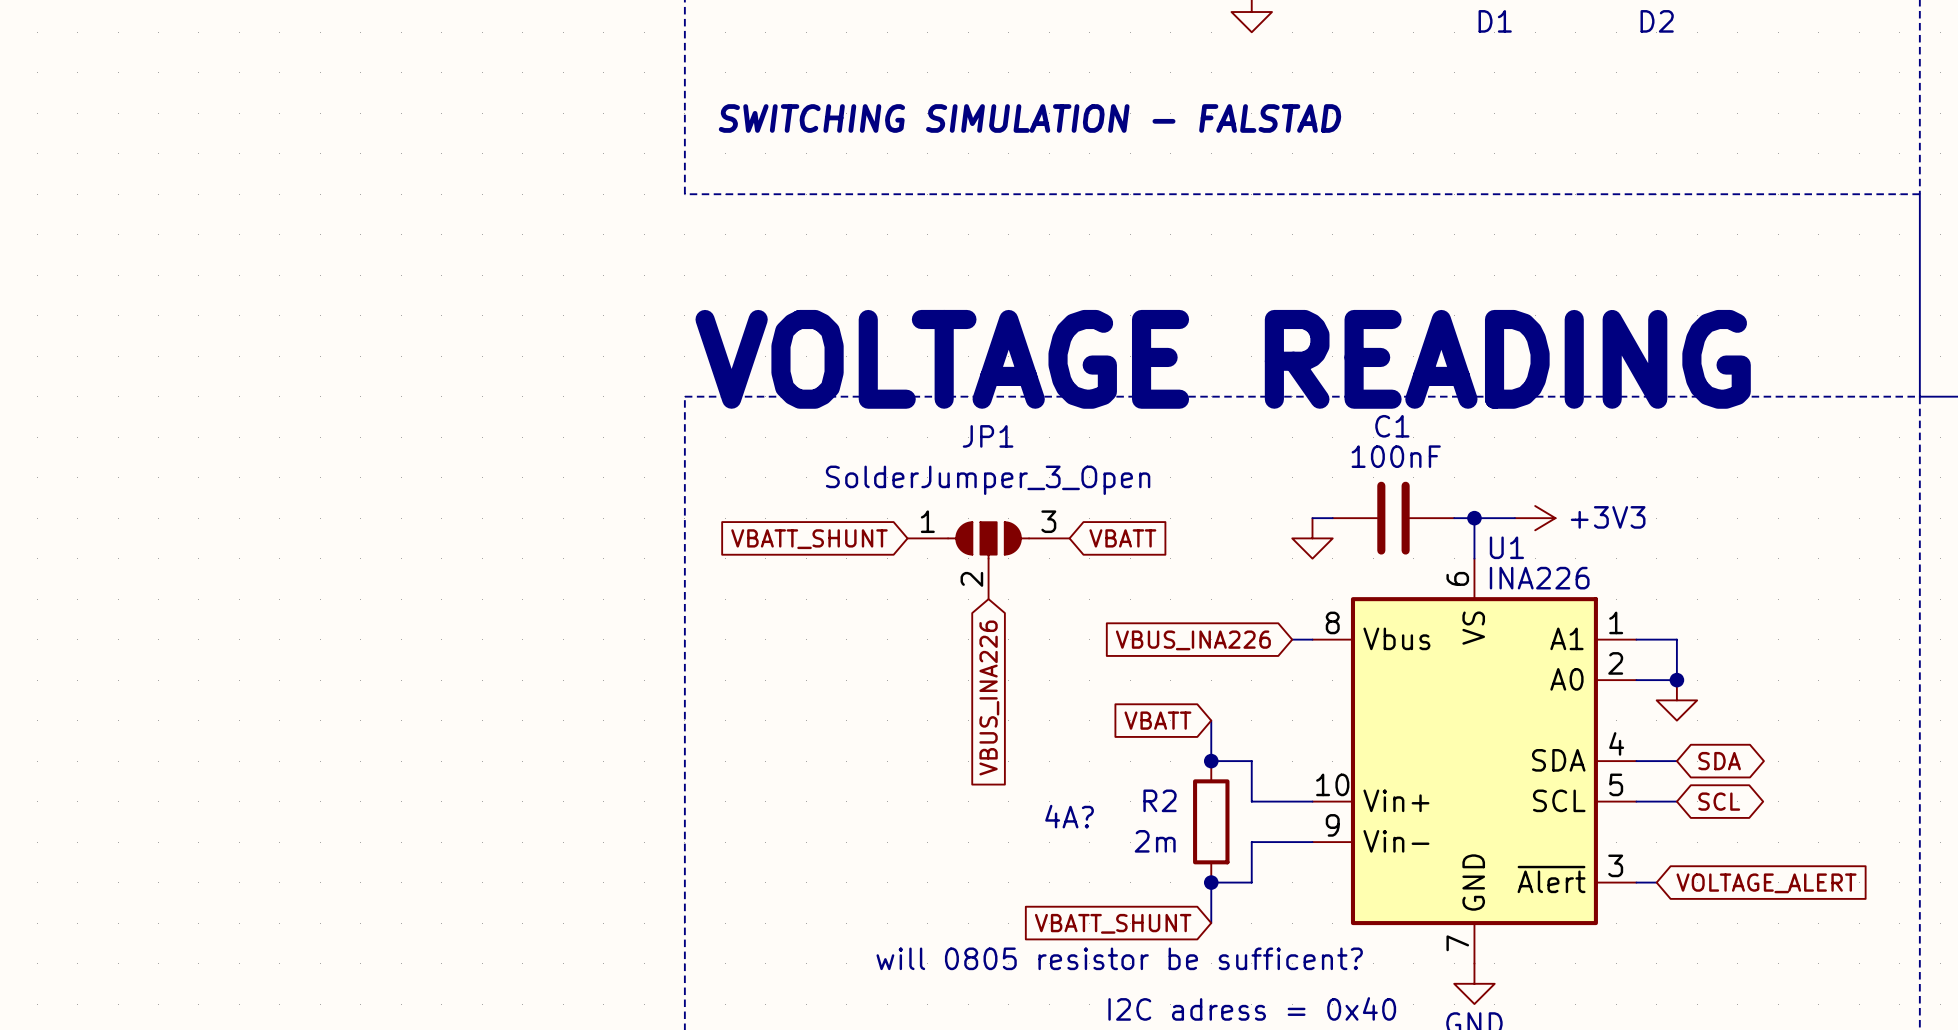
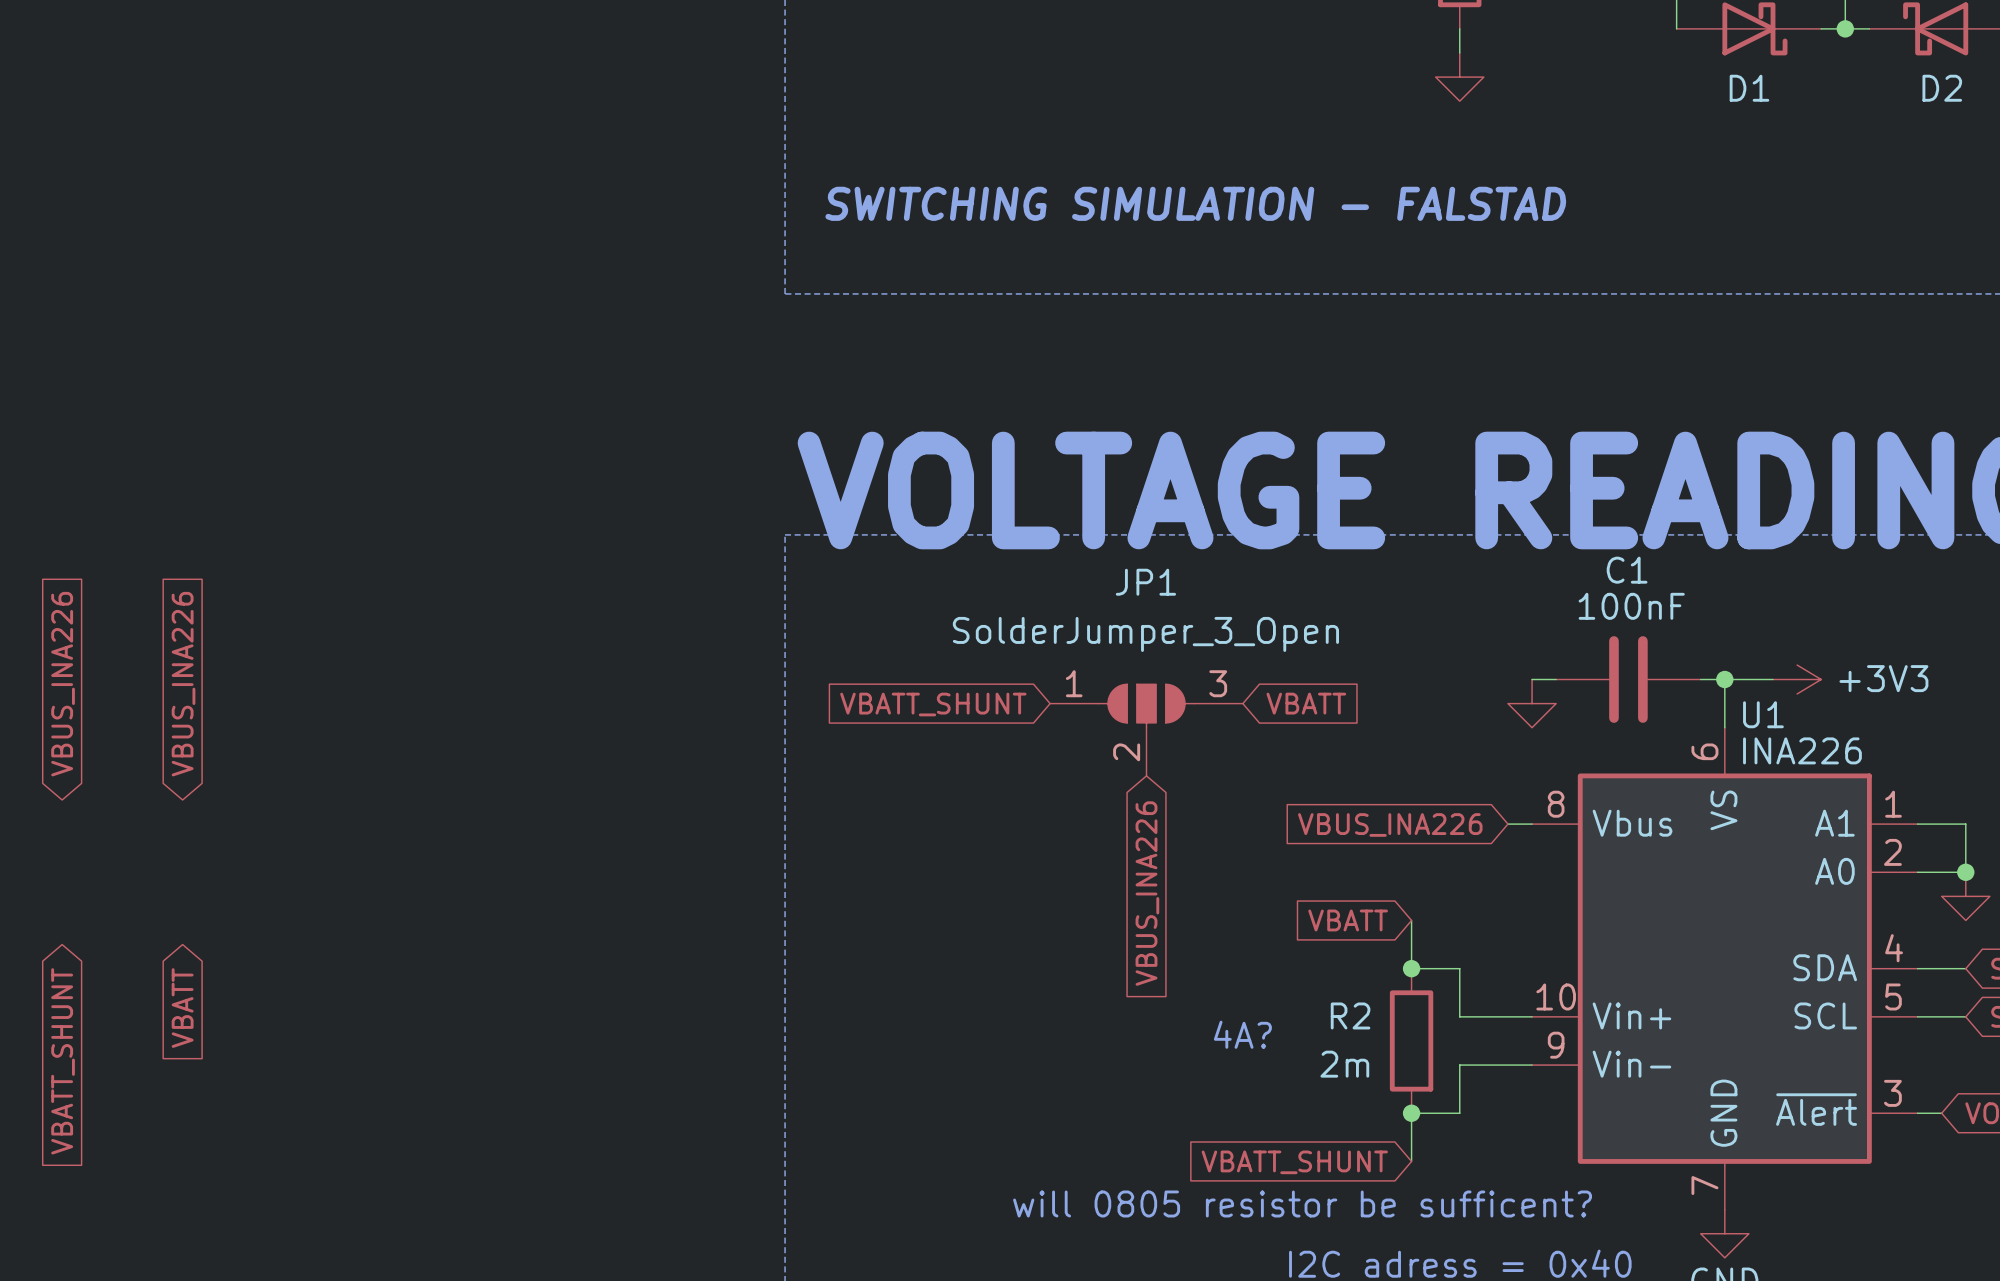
global label: none -> VBUS_INA226 (63, 684)
global label: none -> VBUS_INA226 (183, 684)
global label: none -> VBATT (182, 1008)
global label: none -> VBATT_SHUNT (63, 1061)

